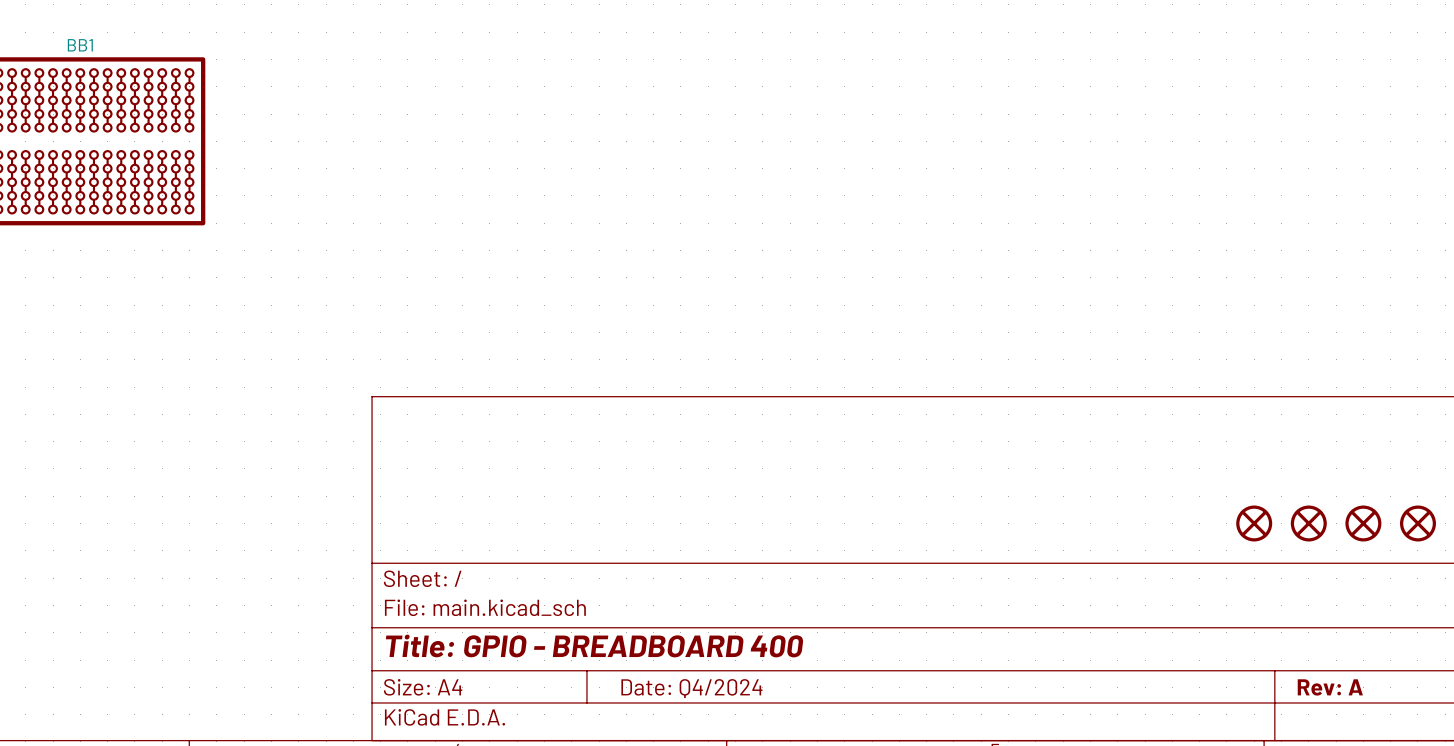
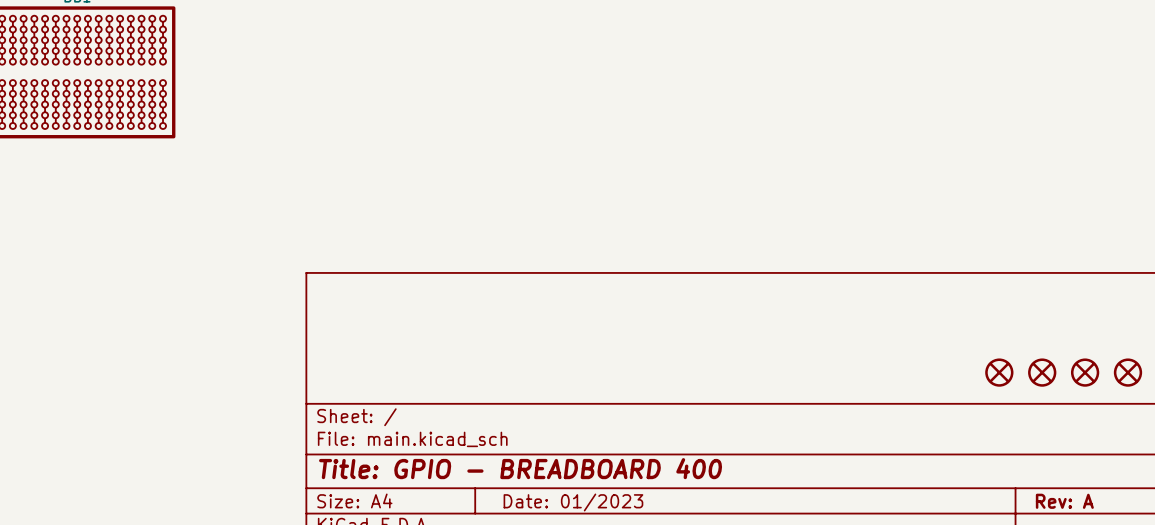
title block: Date: Q4/2024 (691, 688) -> Date: 01/2023 (573, 502)

